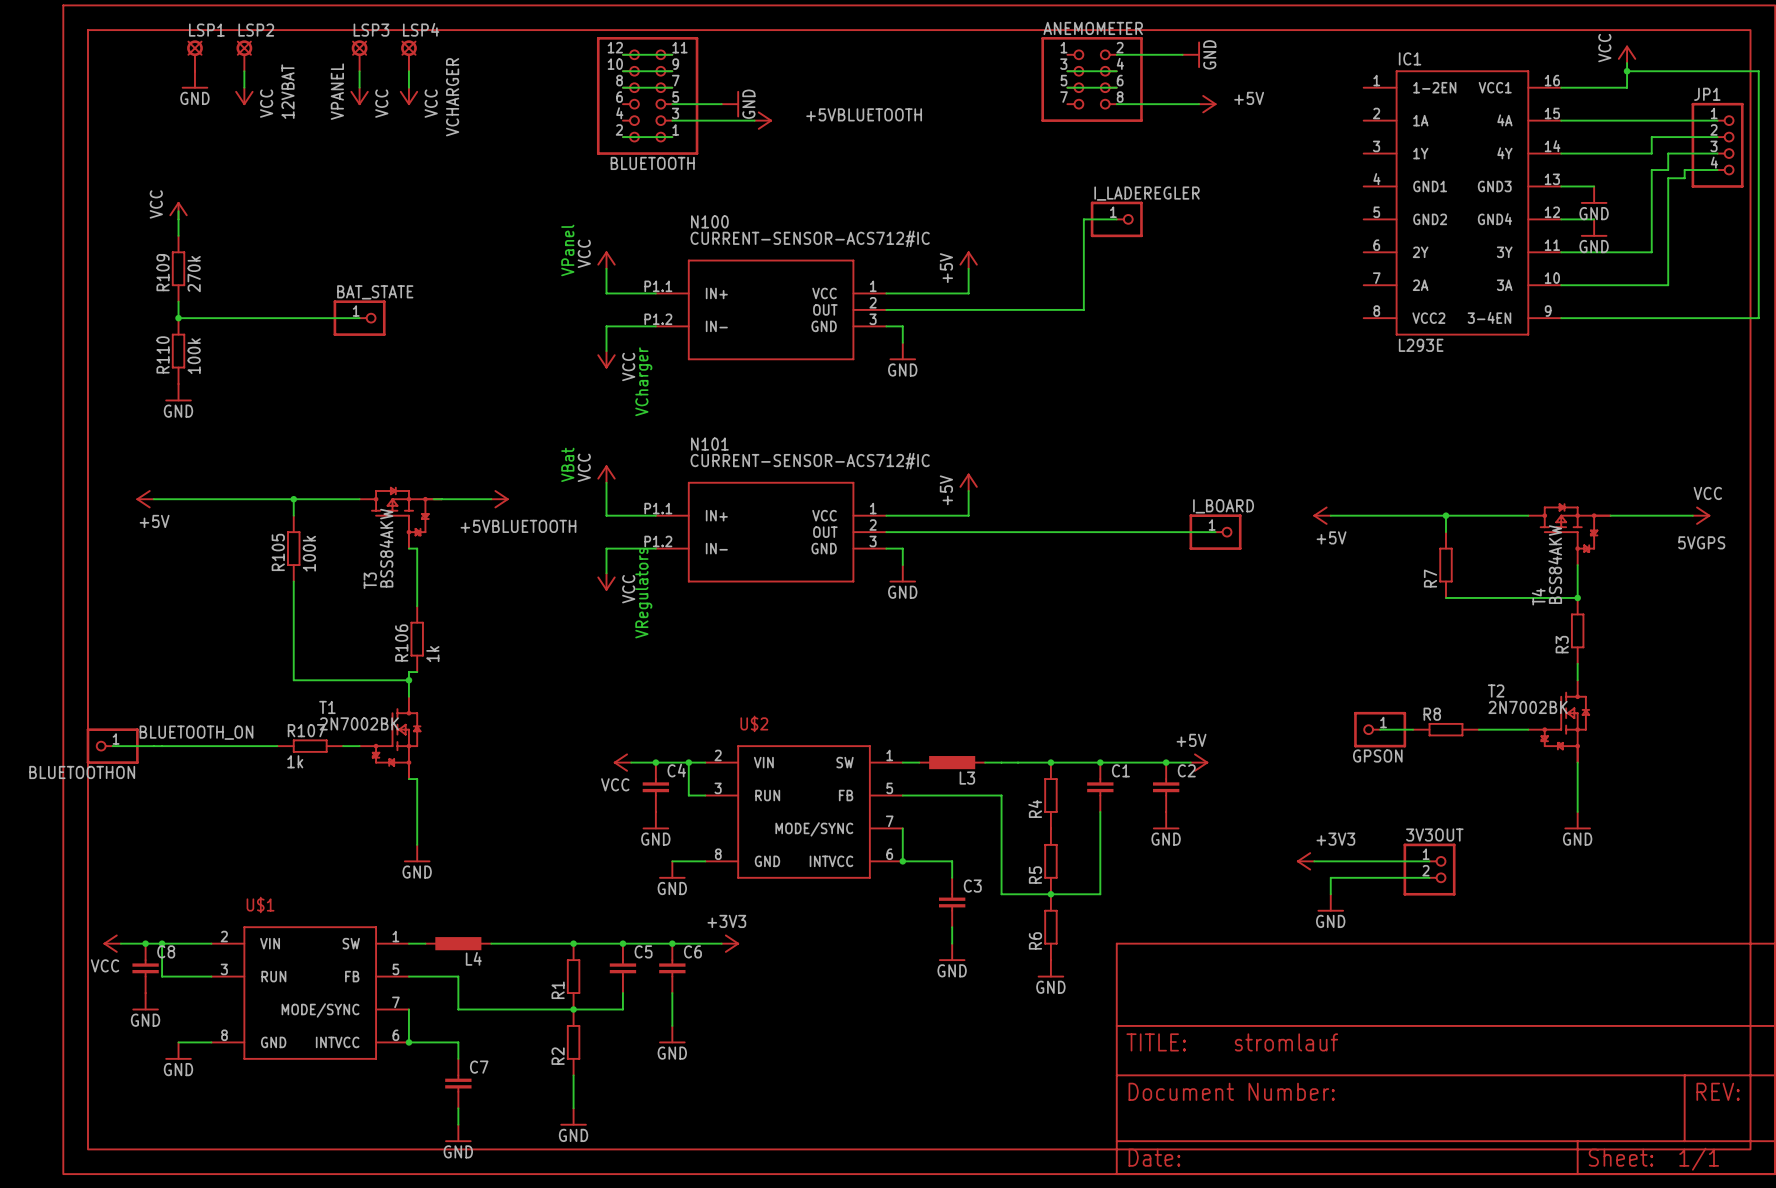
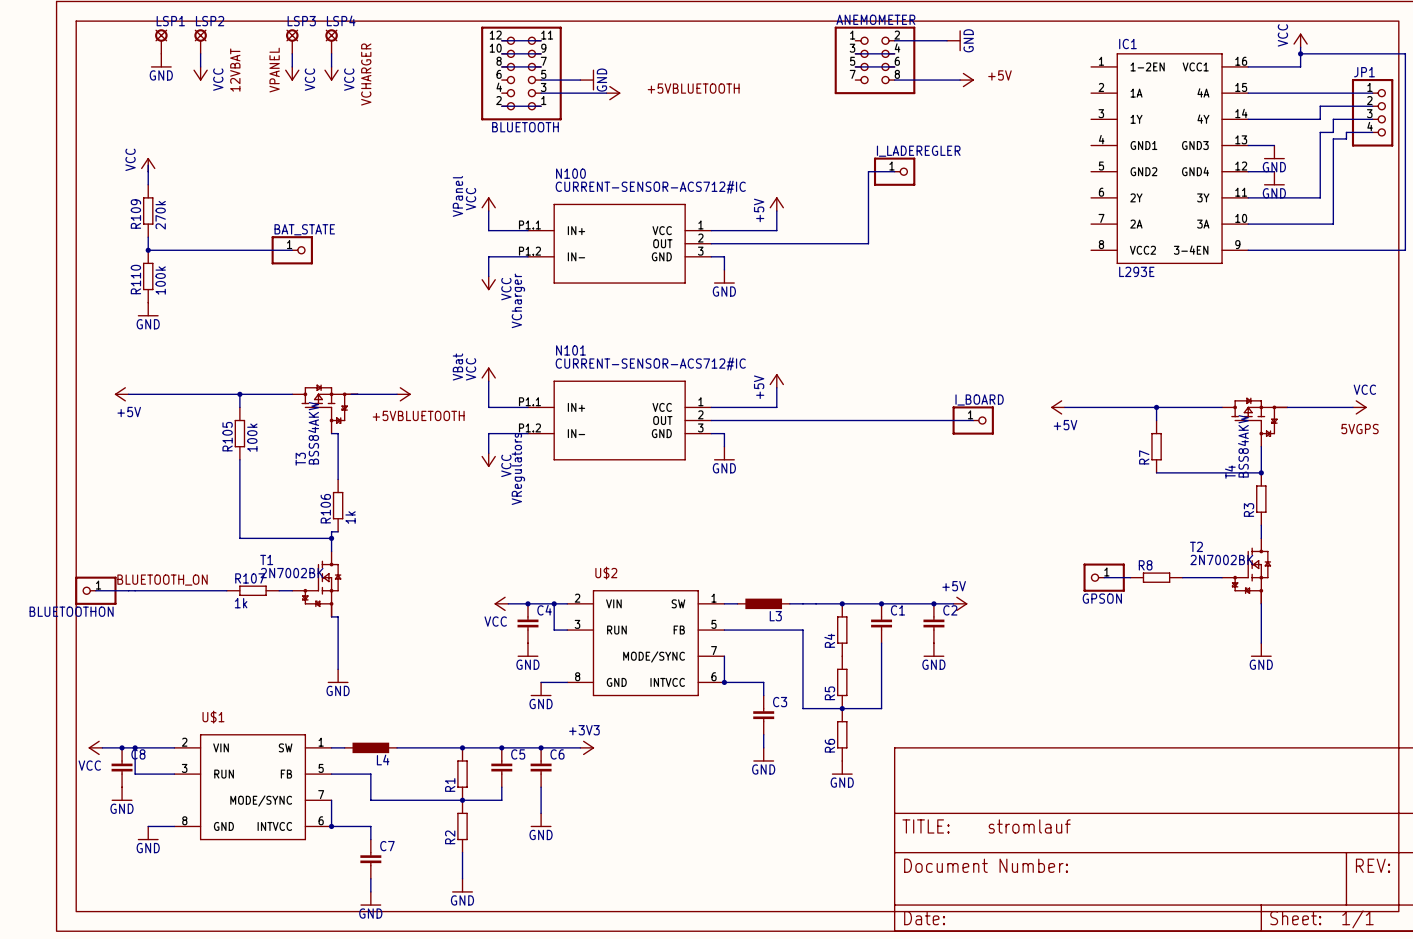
label: +3V3 (1335, 839) -> none
power symbol: (1305, 861) -> none
wire: (1314, 861) (1429, 861) -> none
3V3OUT: (1429, 869) -> none
wire: (1429, 877) (1330, 877) (1330, 894) -> none
power symbol: GND (1330, 902) -> none

